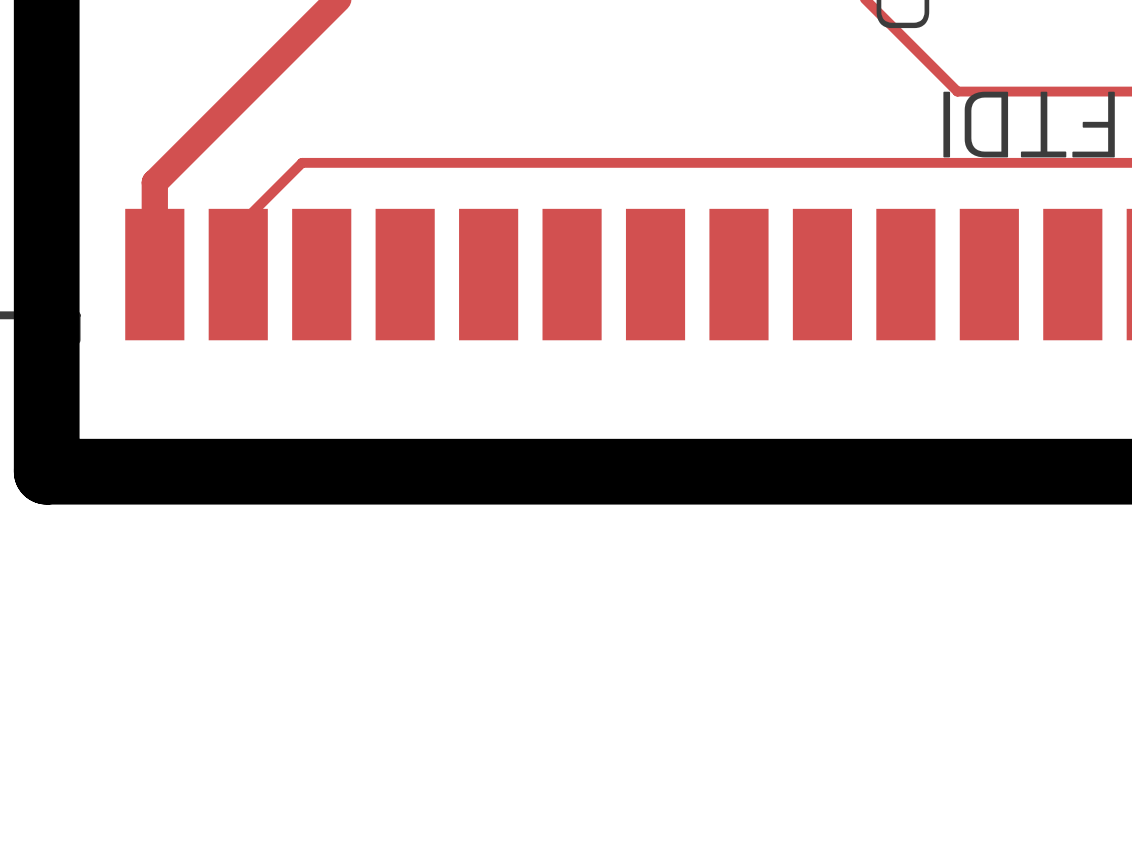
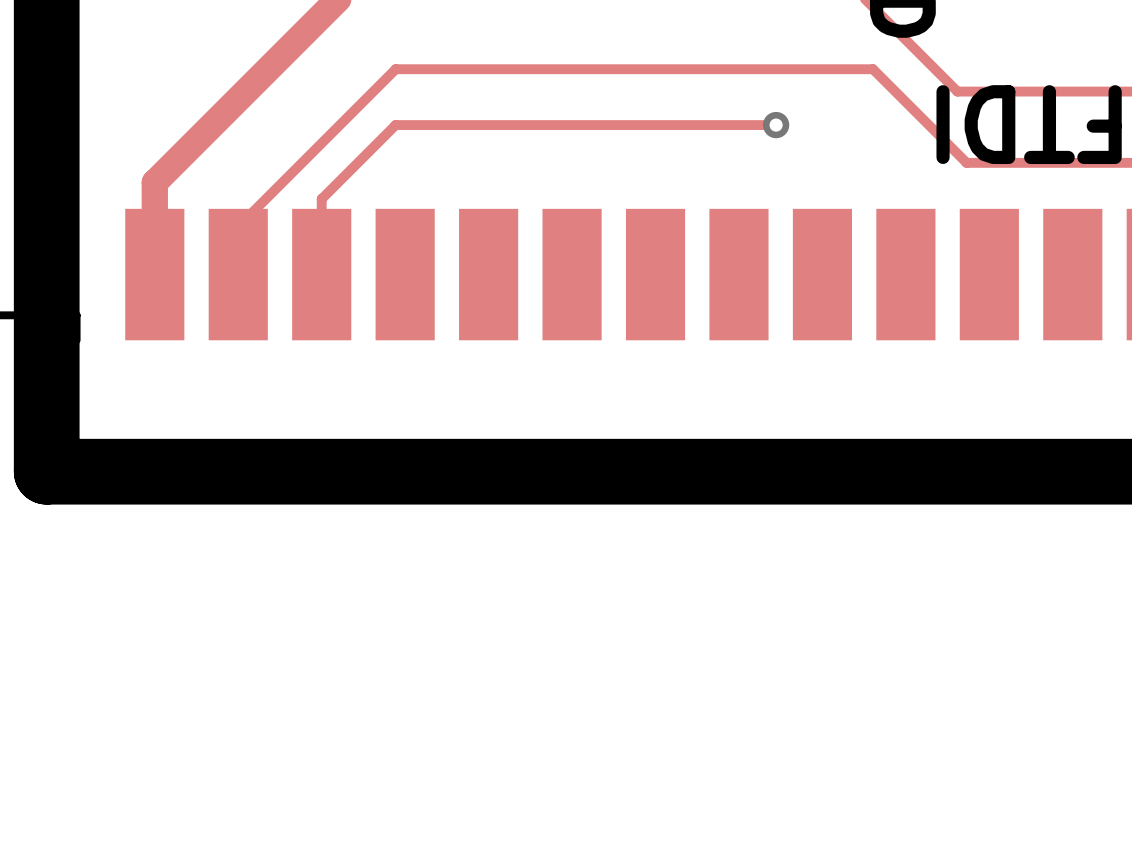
track: none -> (776, 125) (395, 125) (321, 199) (321, 274)
via: none -> (776, 125)
track: (302, 162) (966, 162) -> (302, 162) (395, 69) (873, 69) (966, 162)

